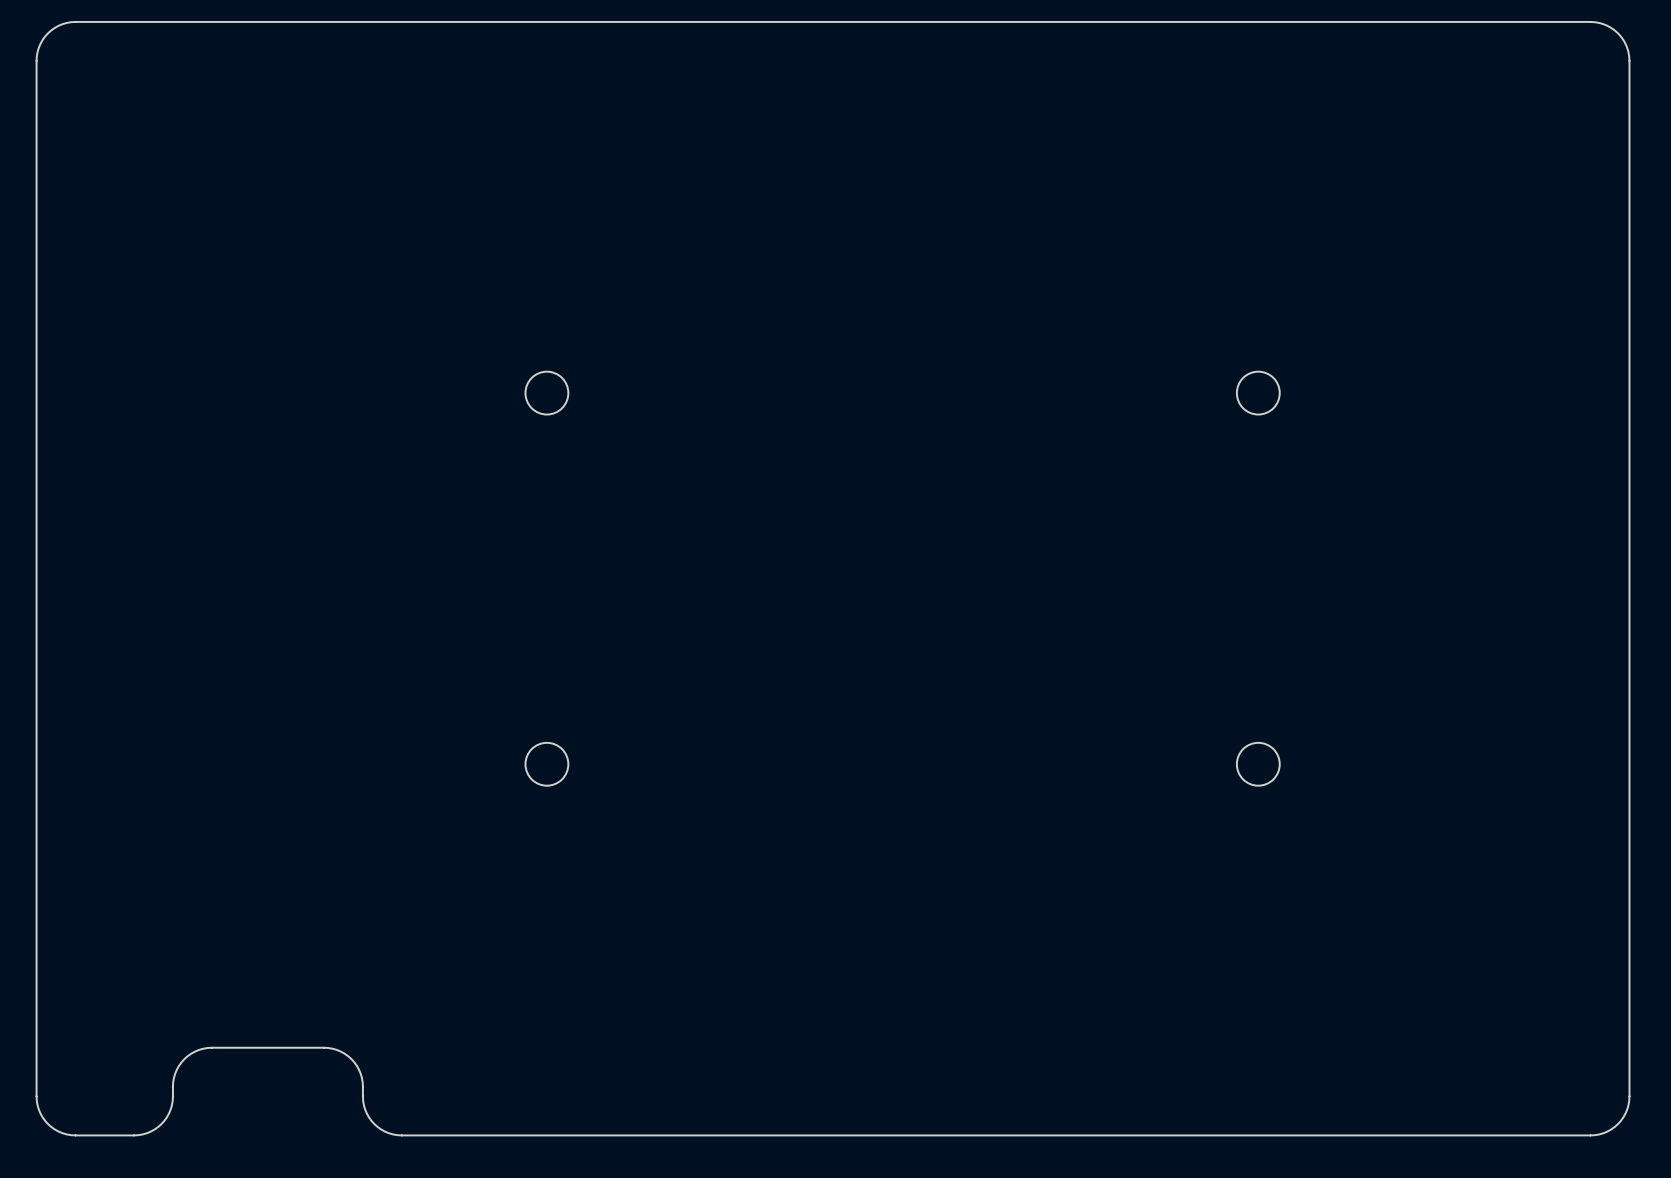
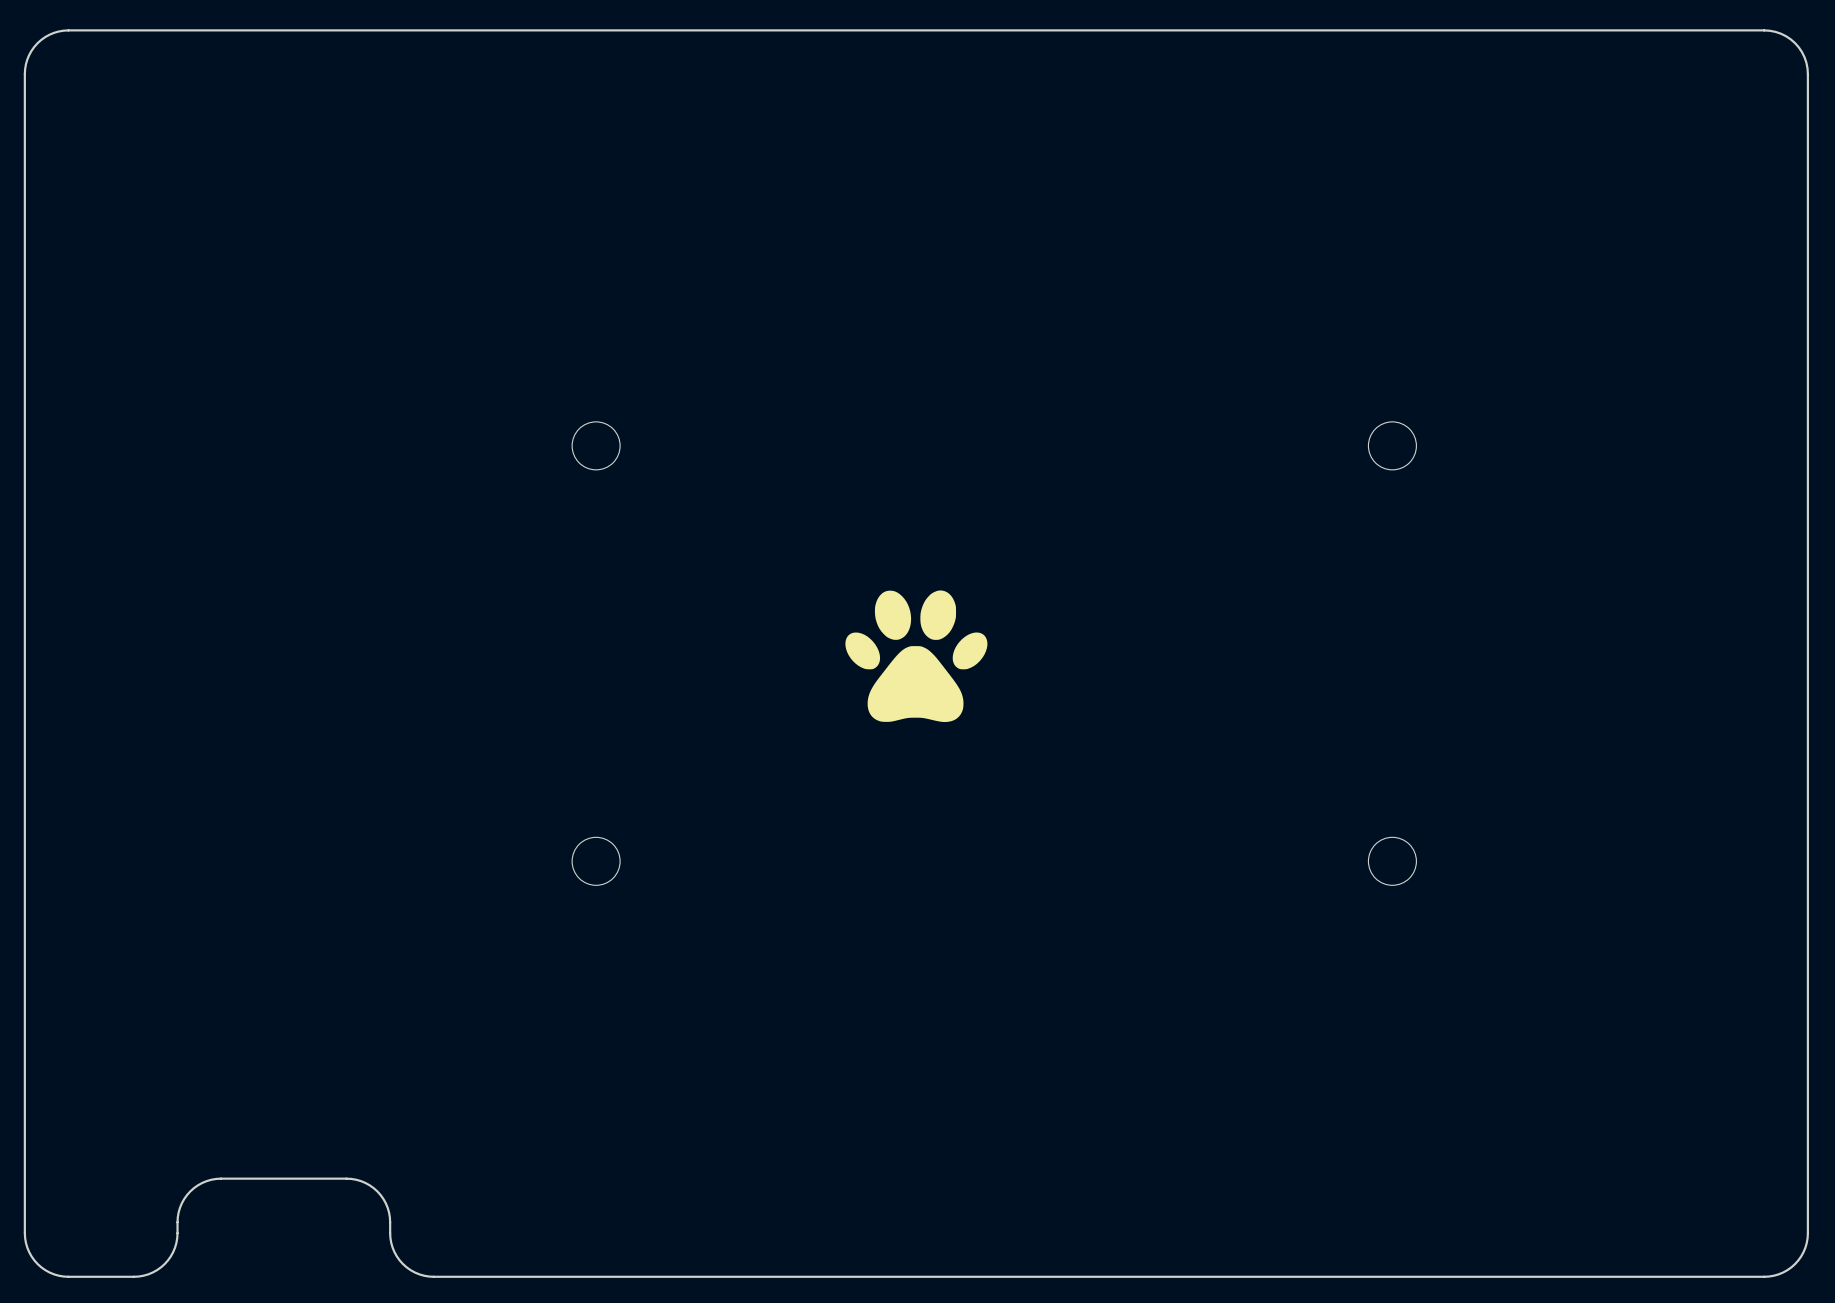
drawing: none -> [845, 590, 988, 723]

